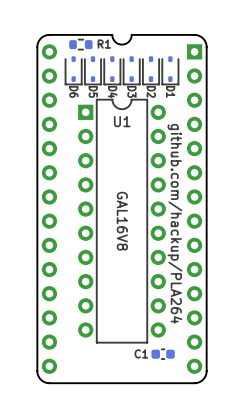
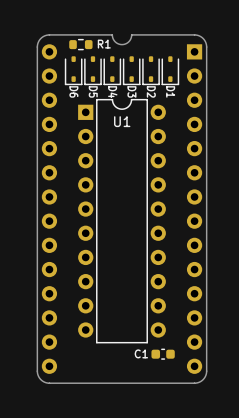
U1 value: GAL16V8 (122, 221) -> none
text: github.com/hackup/PLA264 (174, 223) -> none

